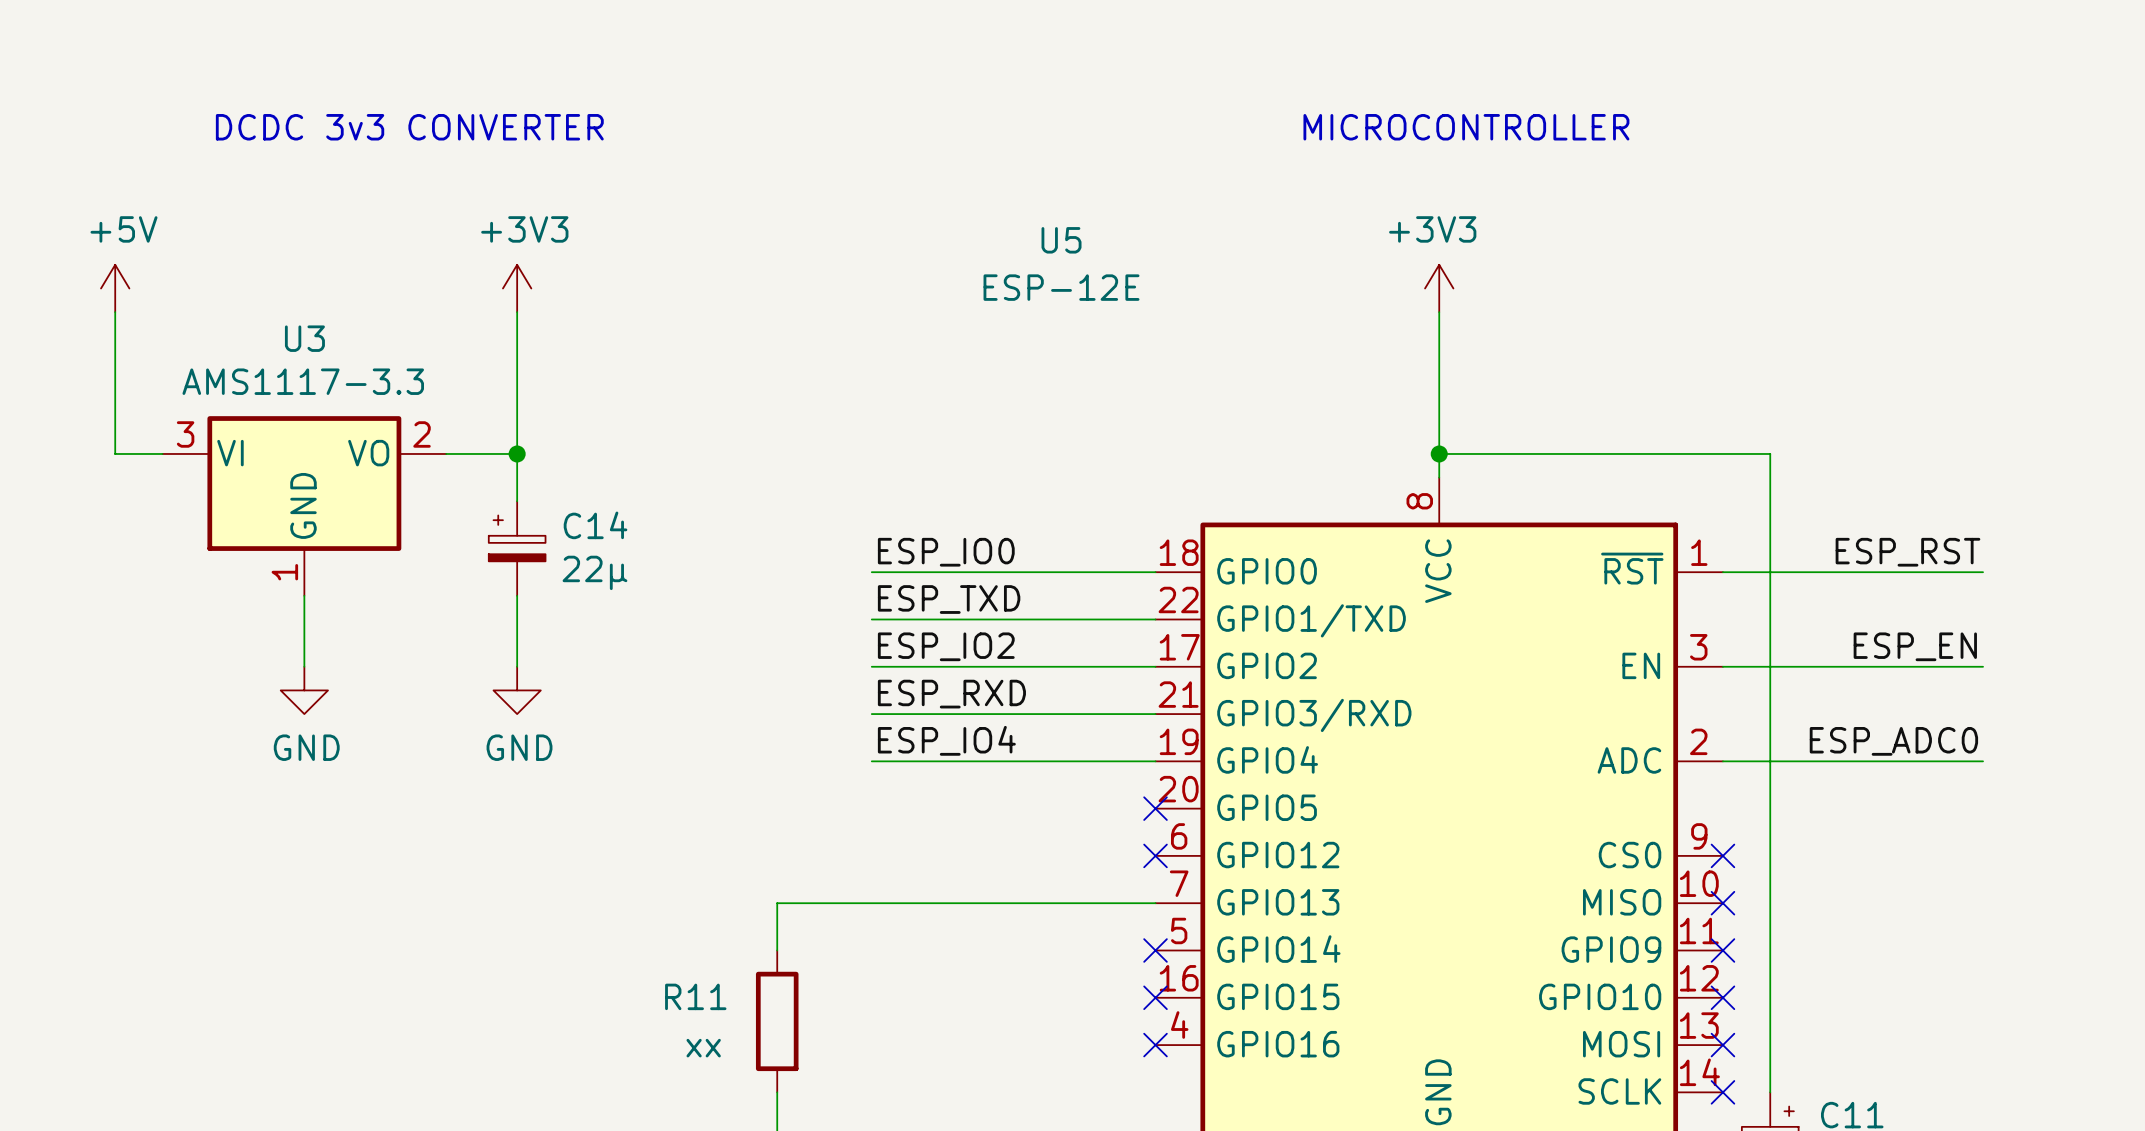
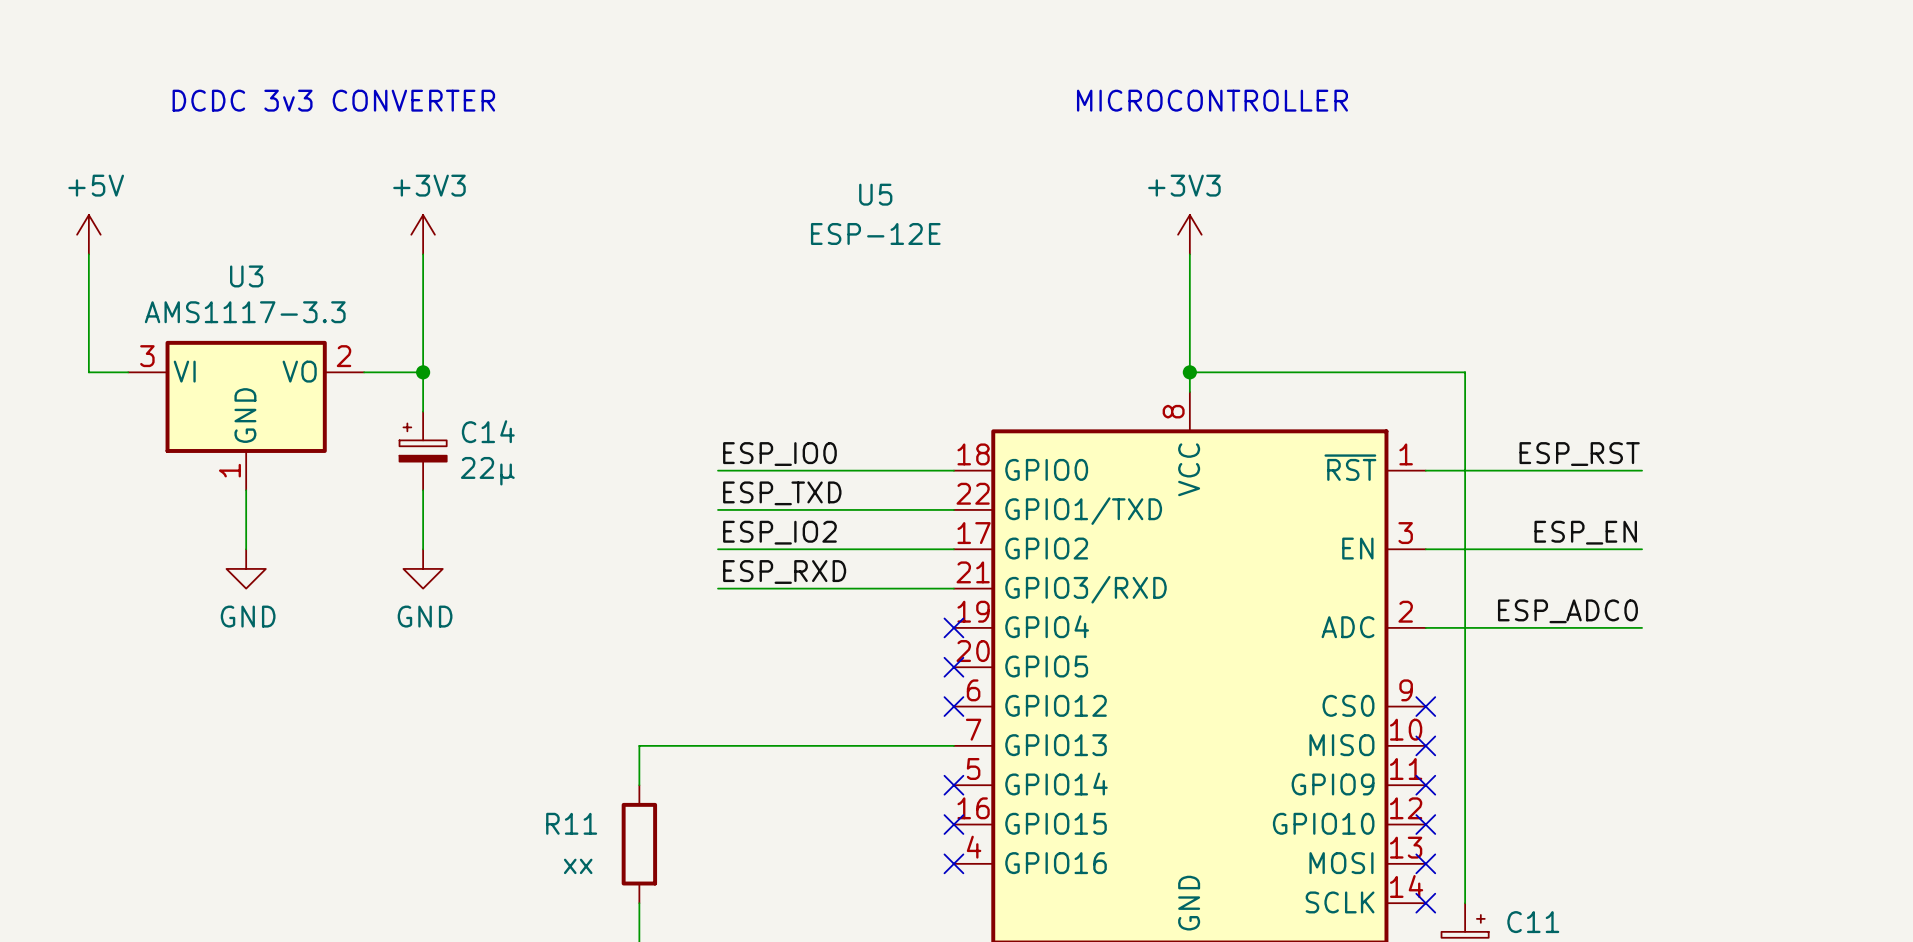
label: ESP_IO4 (946, 740) -> none
wire: (871, 761) (1155, 761) -> none
no-connect mark: none -> (953, 627)

